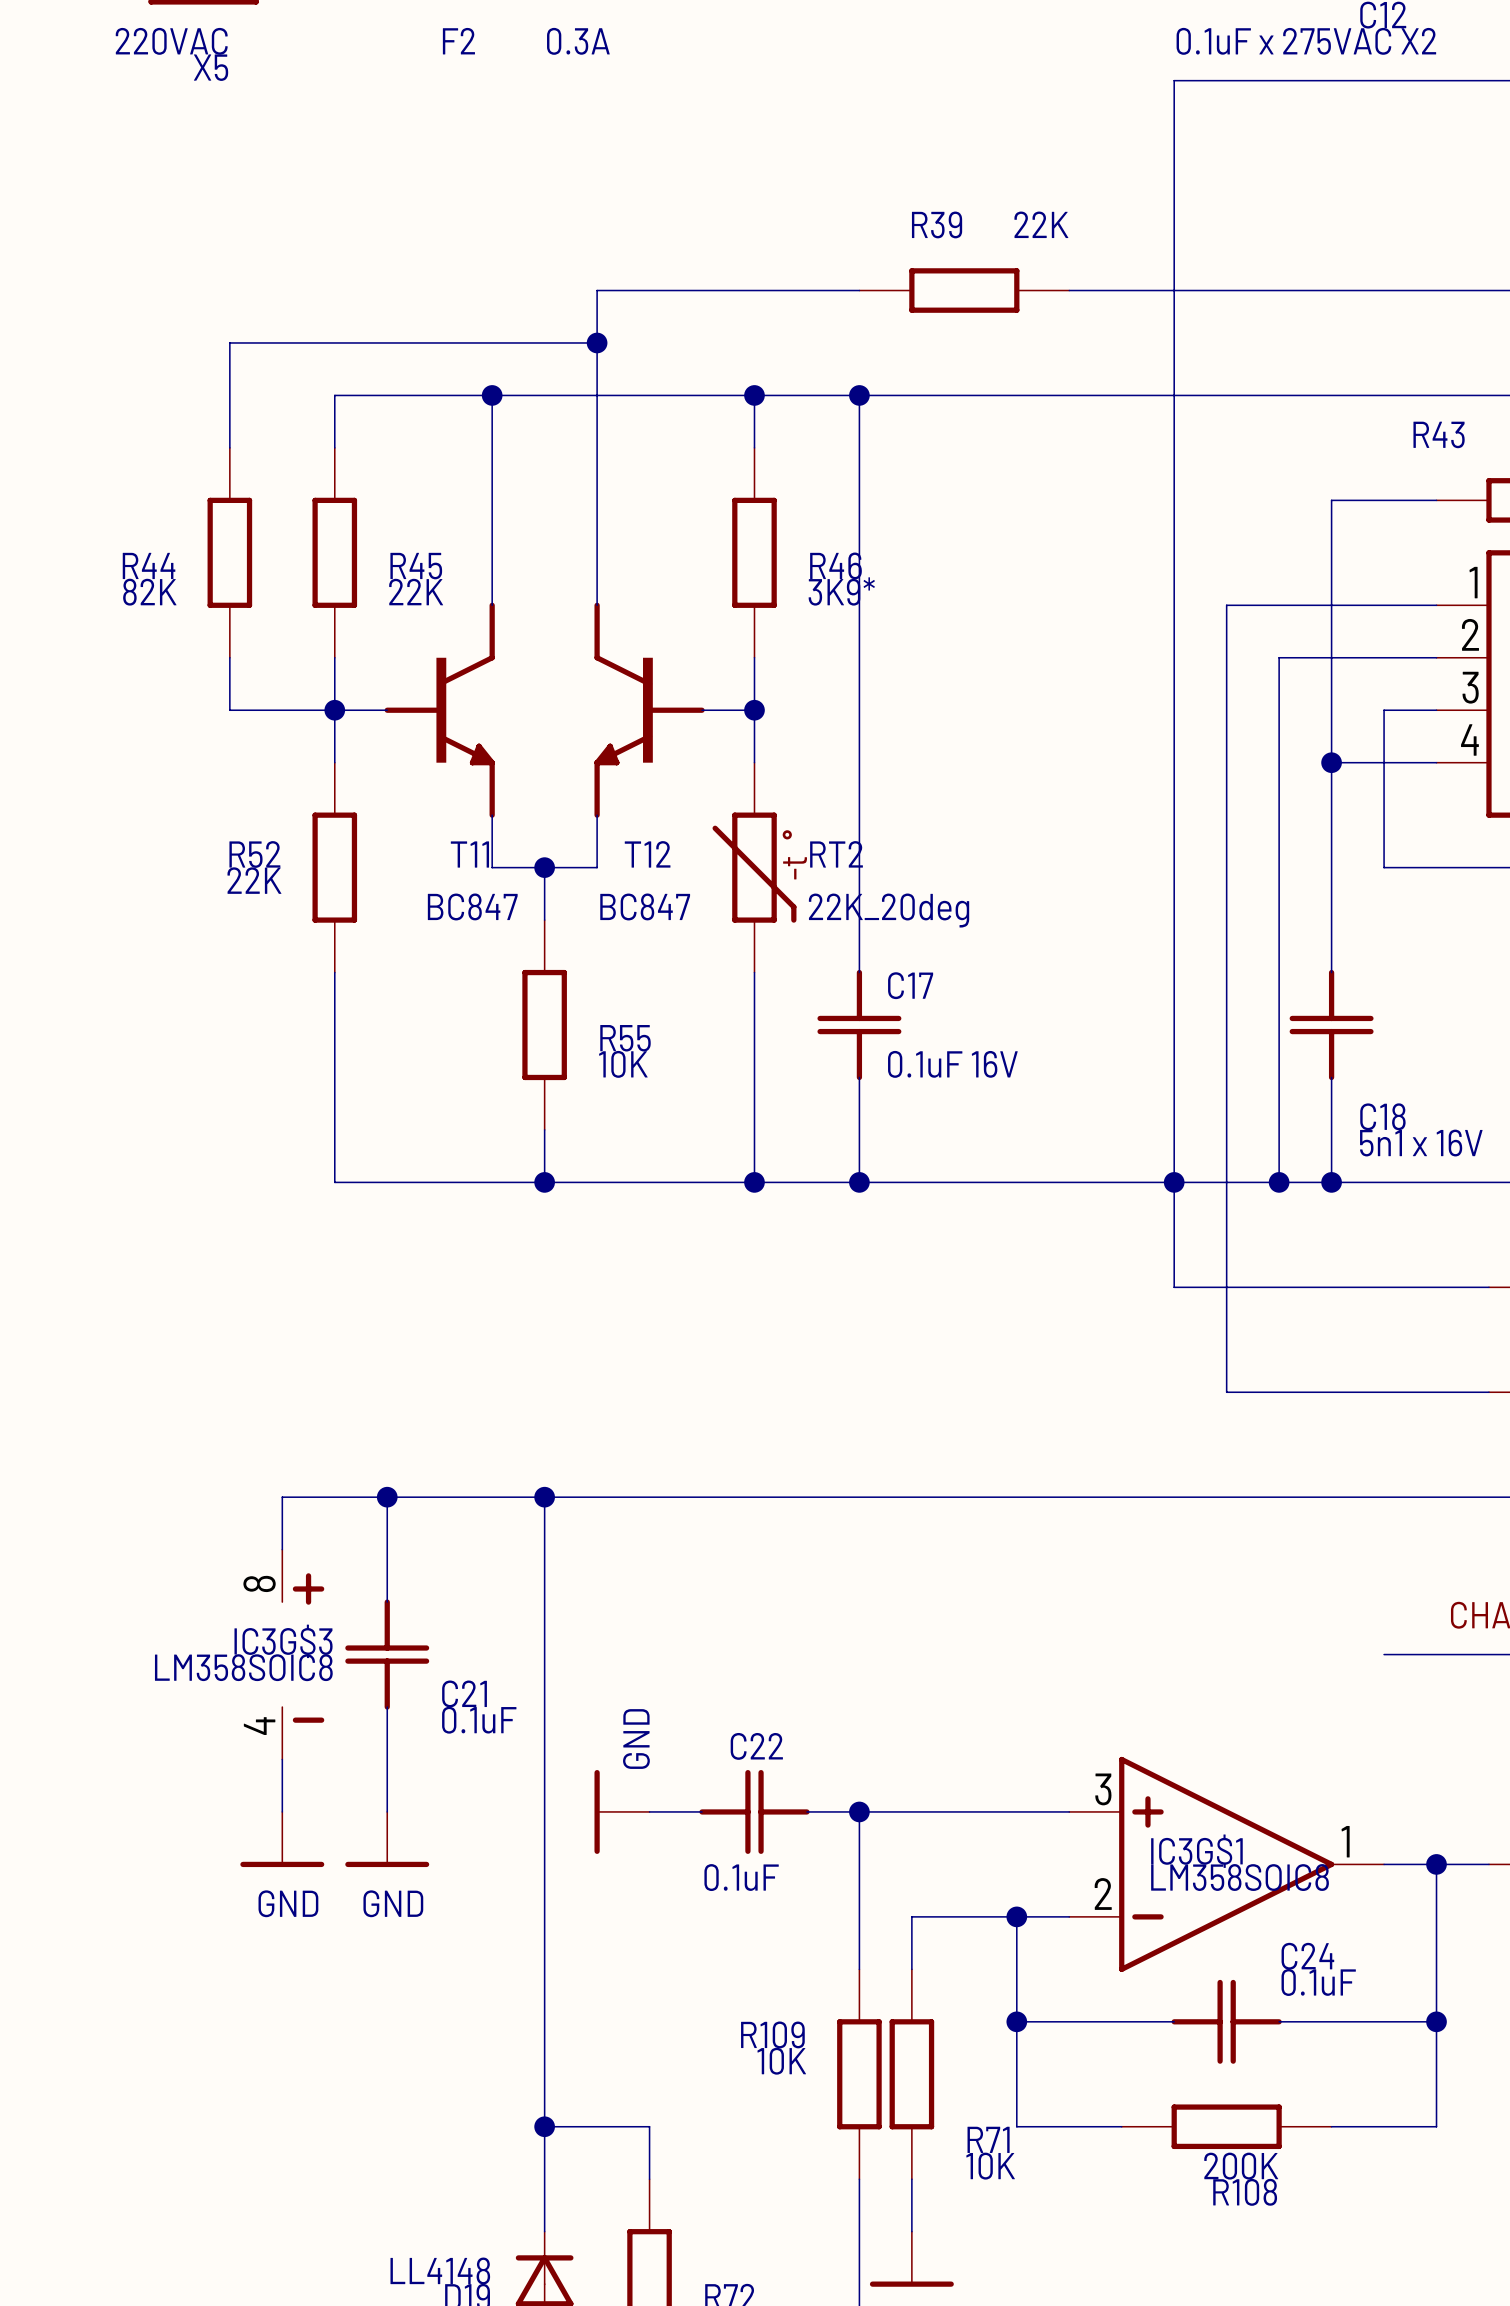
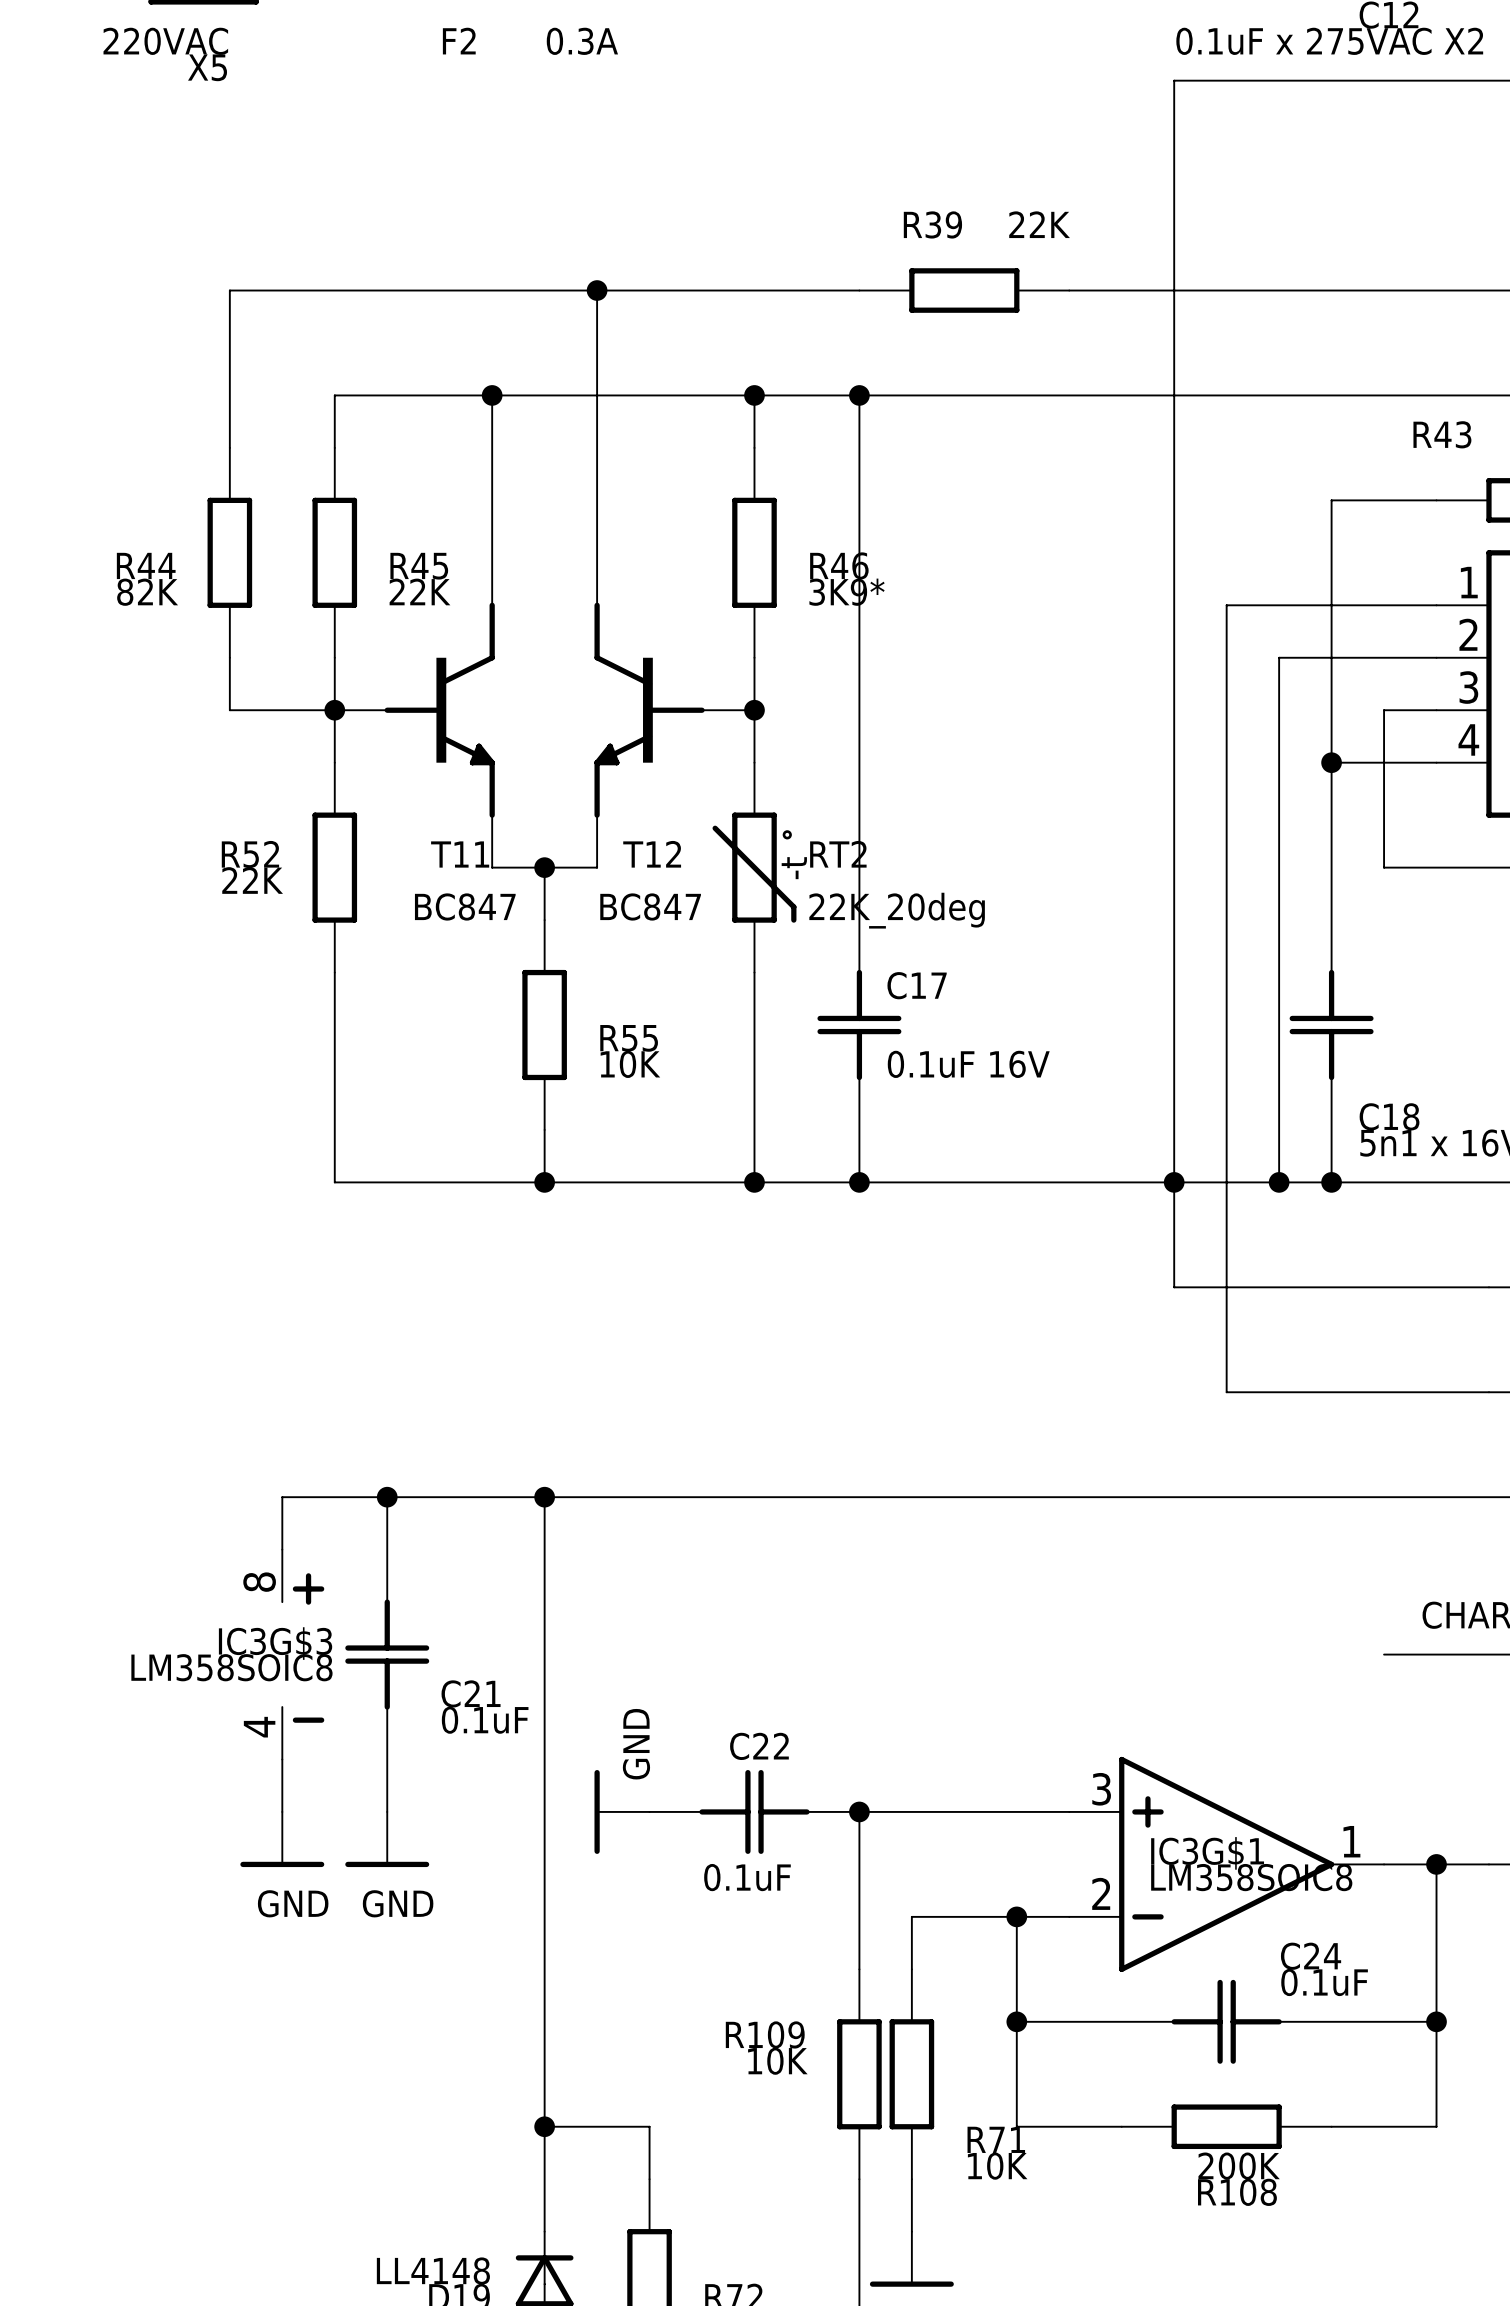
wire: (229, 342) (597, 342) -> (229, 342) (229, 290) (597, 290)
junction position: (597, 342) -> (597, 290)

